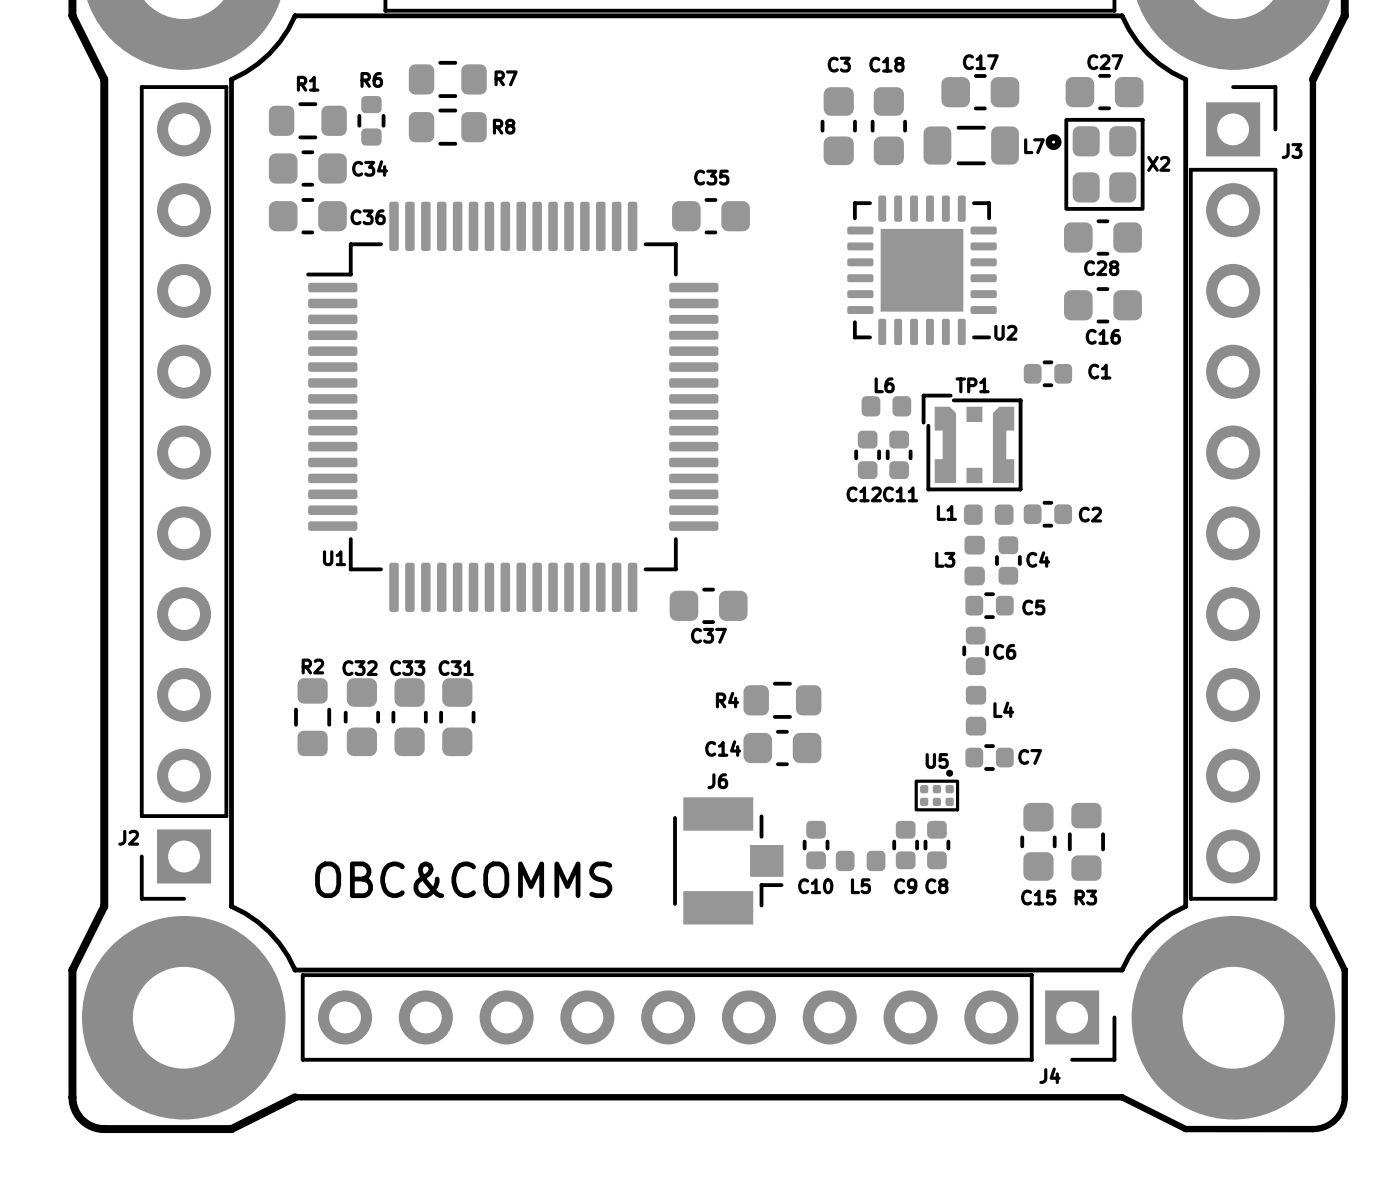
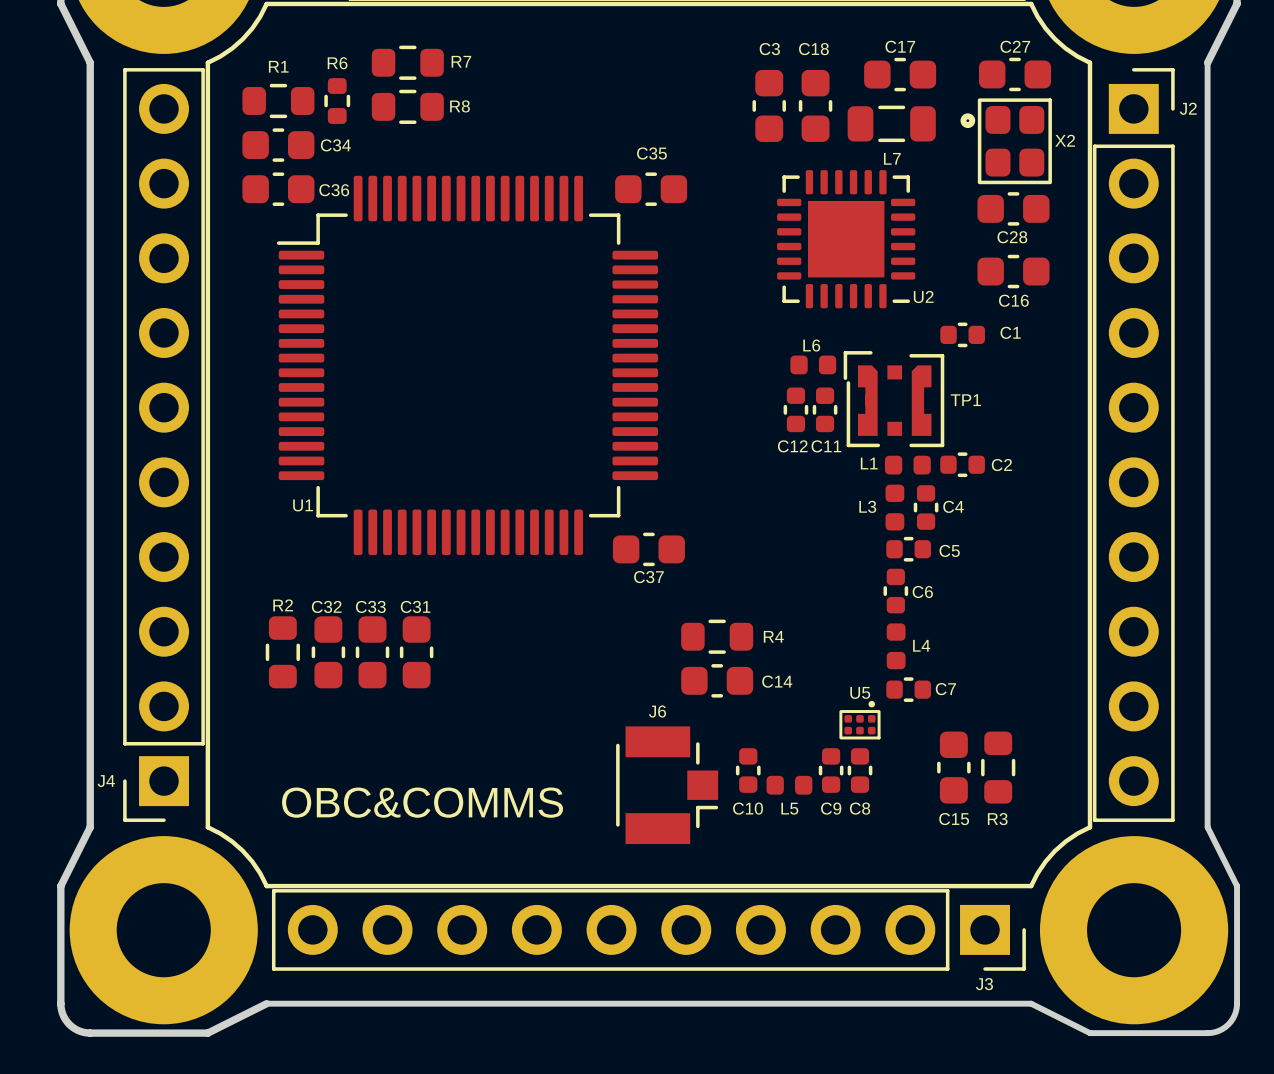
L7 name position: L7 (1034, 146) -> L7 (892, 158)
J3 name: J3 (1292, 151) -> J2 (1188, 108)
TP1 name position: TP1 (972, 385) -> TP1 (965, 400)
TP1 footprint: [921, 393, 1023, 492] -> [843, 351, 945, 448]
R4 name position: R4 (727, 700) -> R4 (773, 636)
C14 name position: C14 (723, 748) -> C14 (777, 681)
J2 name: J2 (128, 837) -> J4 (106, 781)
J4 name: J4 (1050, 1075) -> J3 (984, 984)

